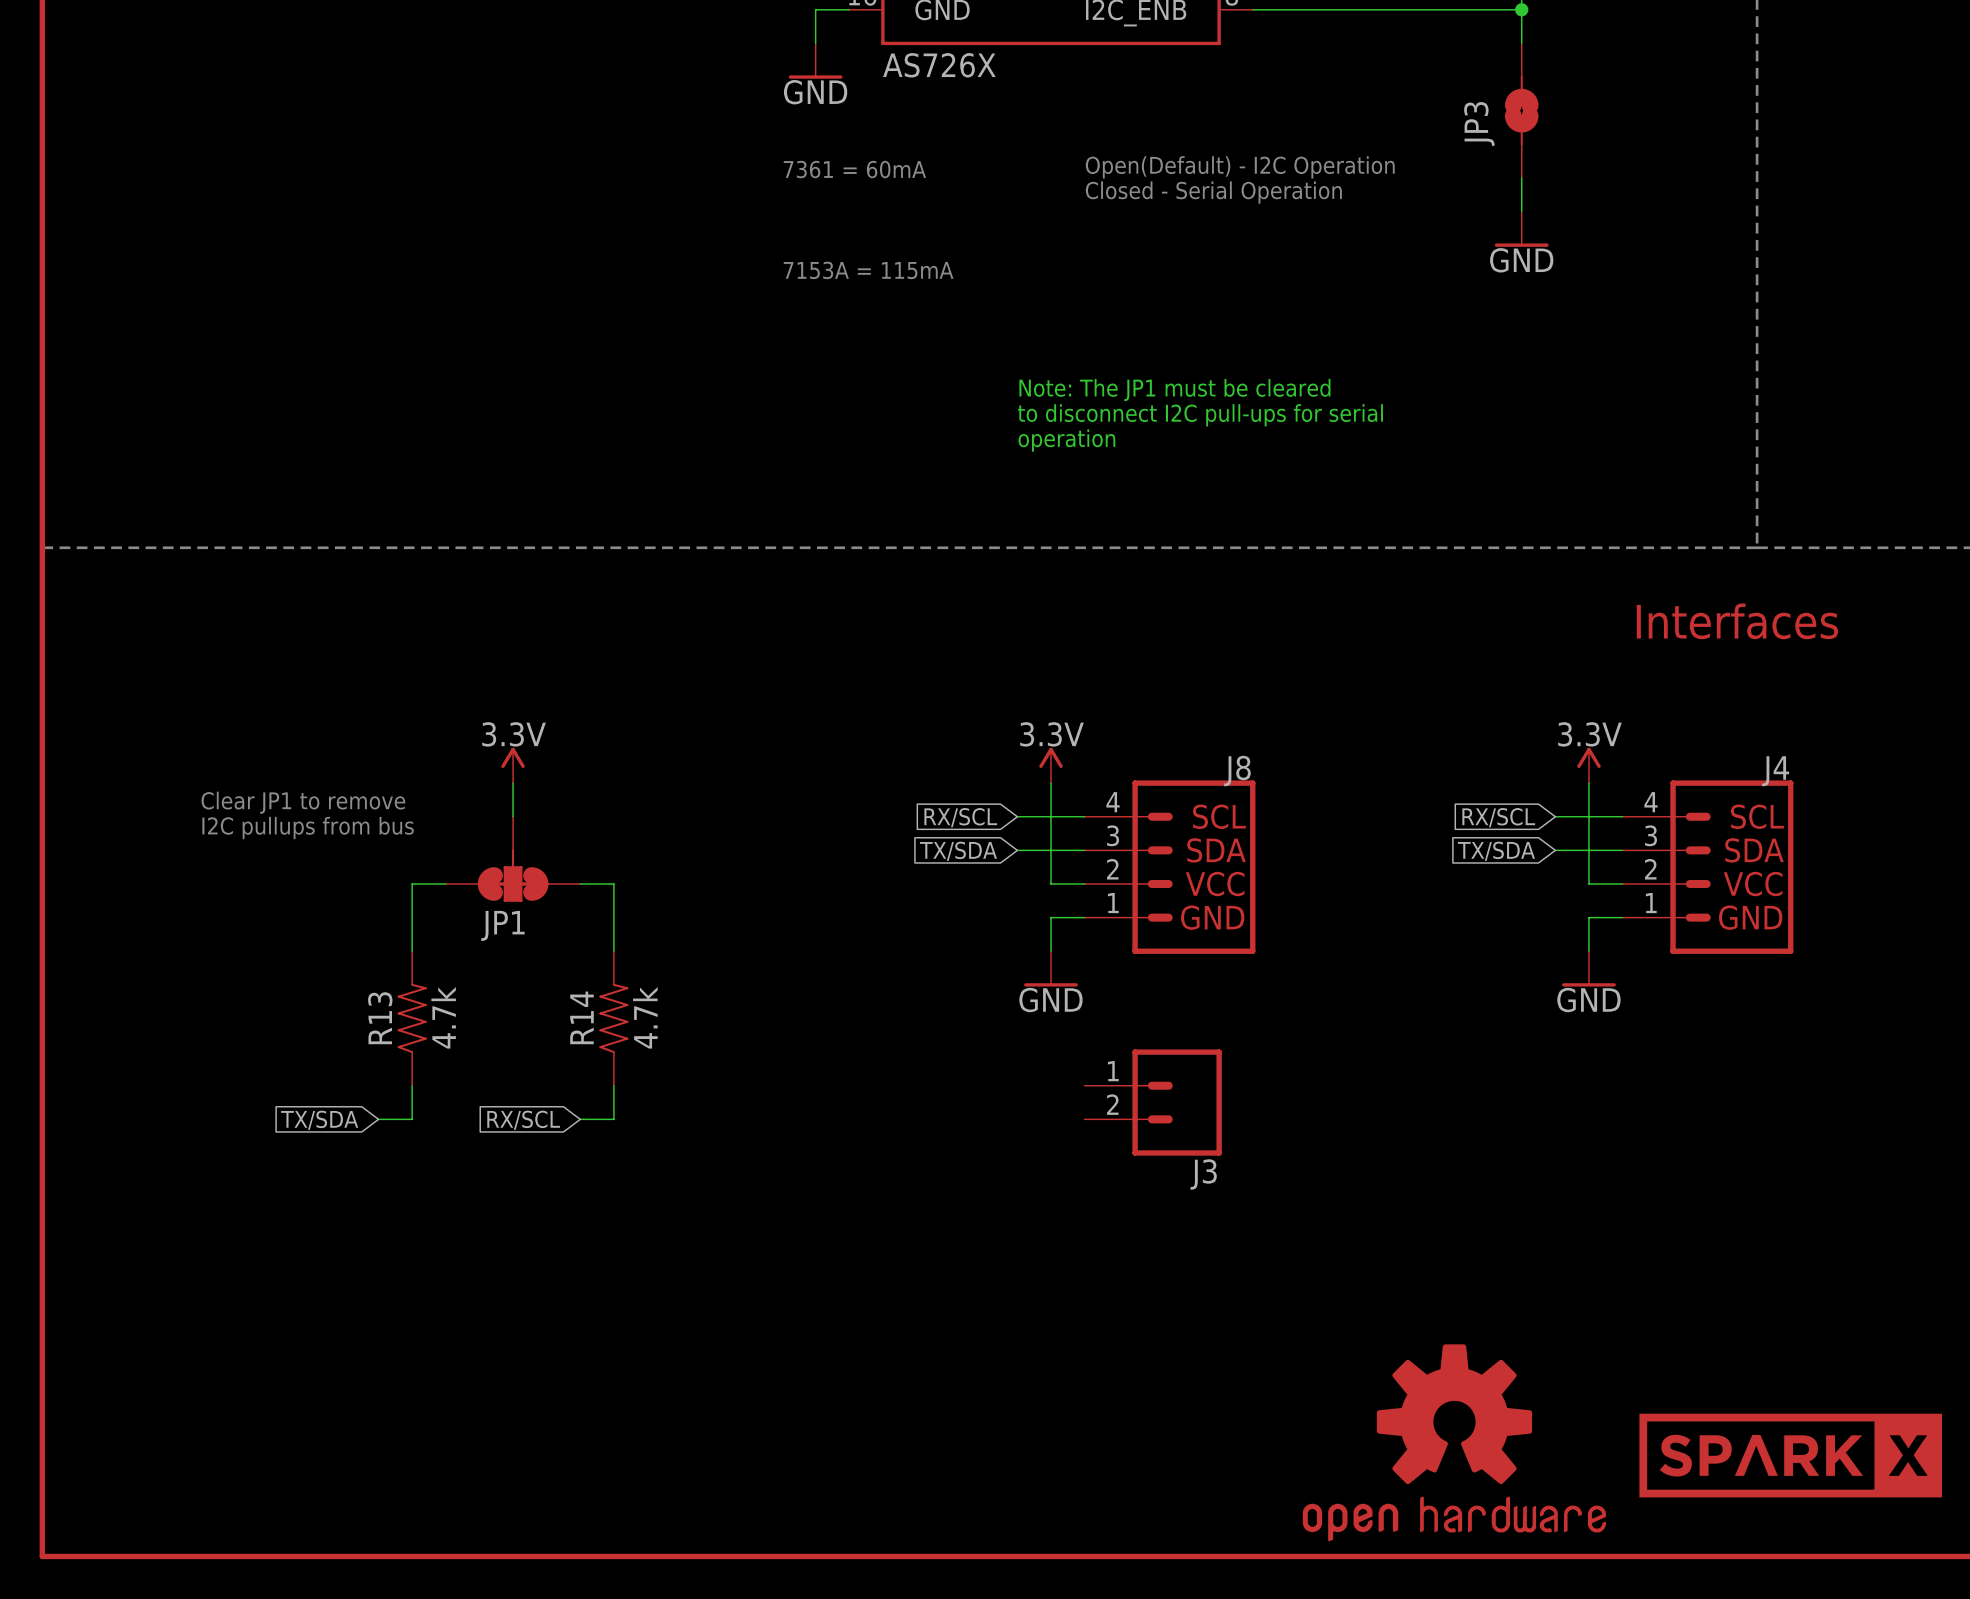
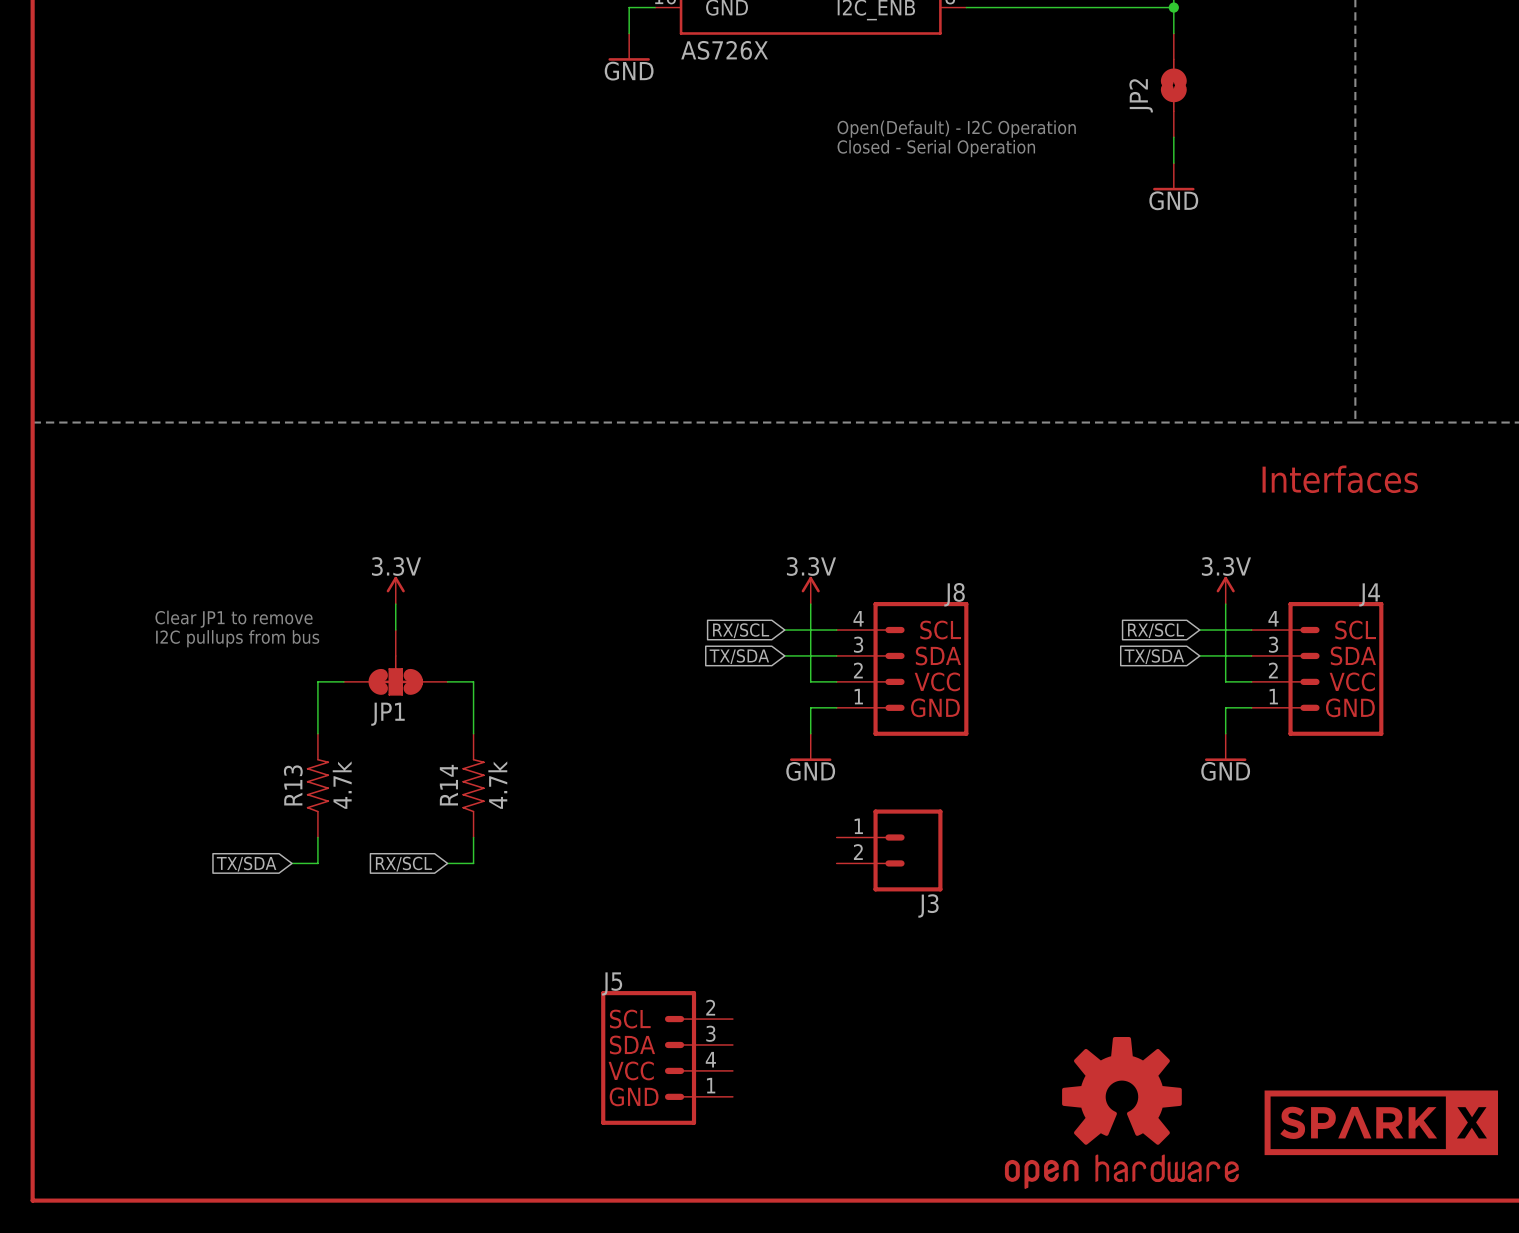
JP3 name: JP3 (1479, 123) -> JP2 (1141, 95)
text: 7361 = 60mA (854, 169) -> none
text: 7153A = 115mA (868, 270) -> none
text: Note: The JP1 must be cleared (1174, 390) -> none
text: to disconnect I2C pull-ups for serial (1200, 415) -> none
text: operation (1066, 440) -> none
J5: none -> (667, 1057)

